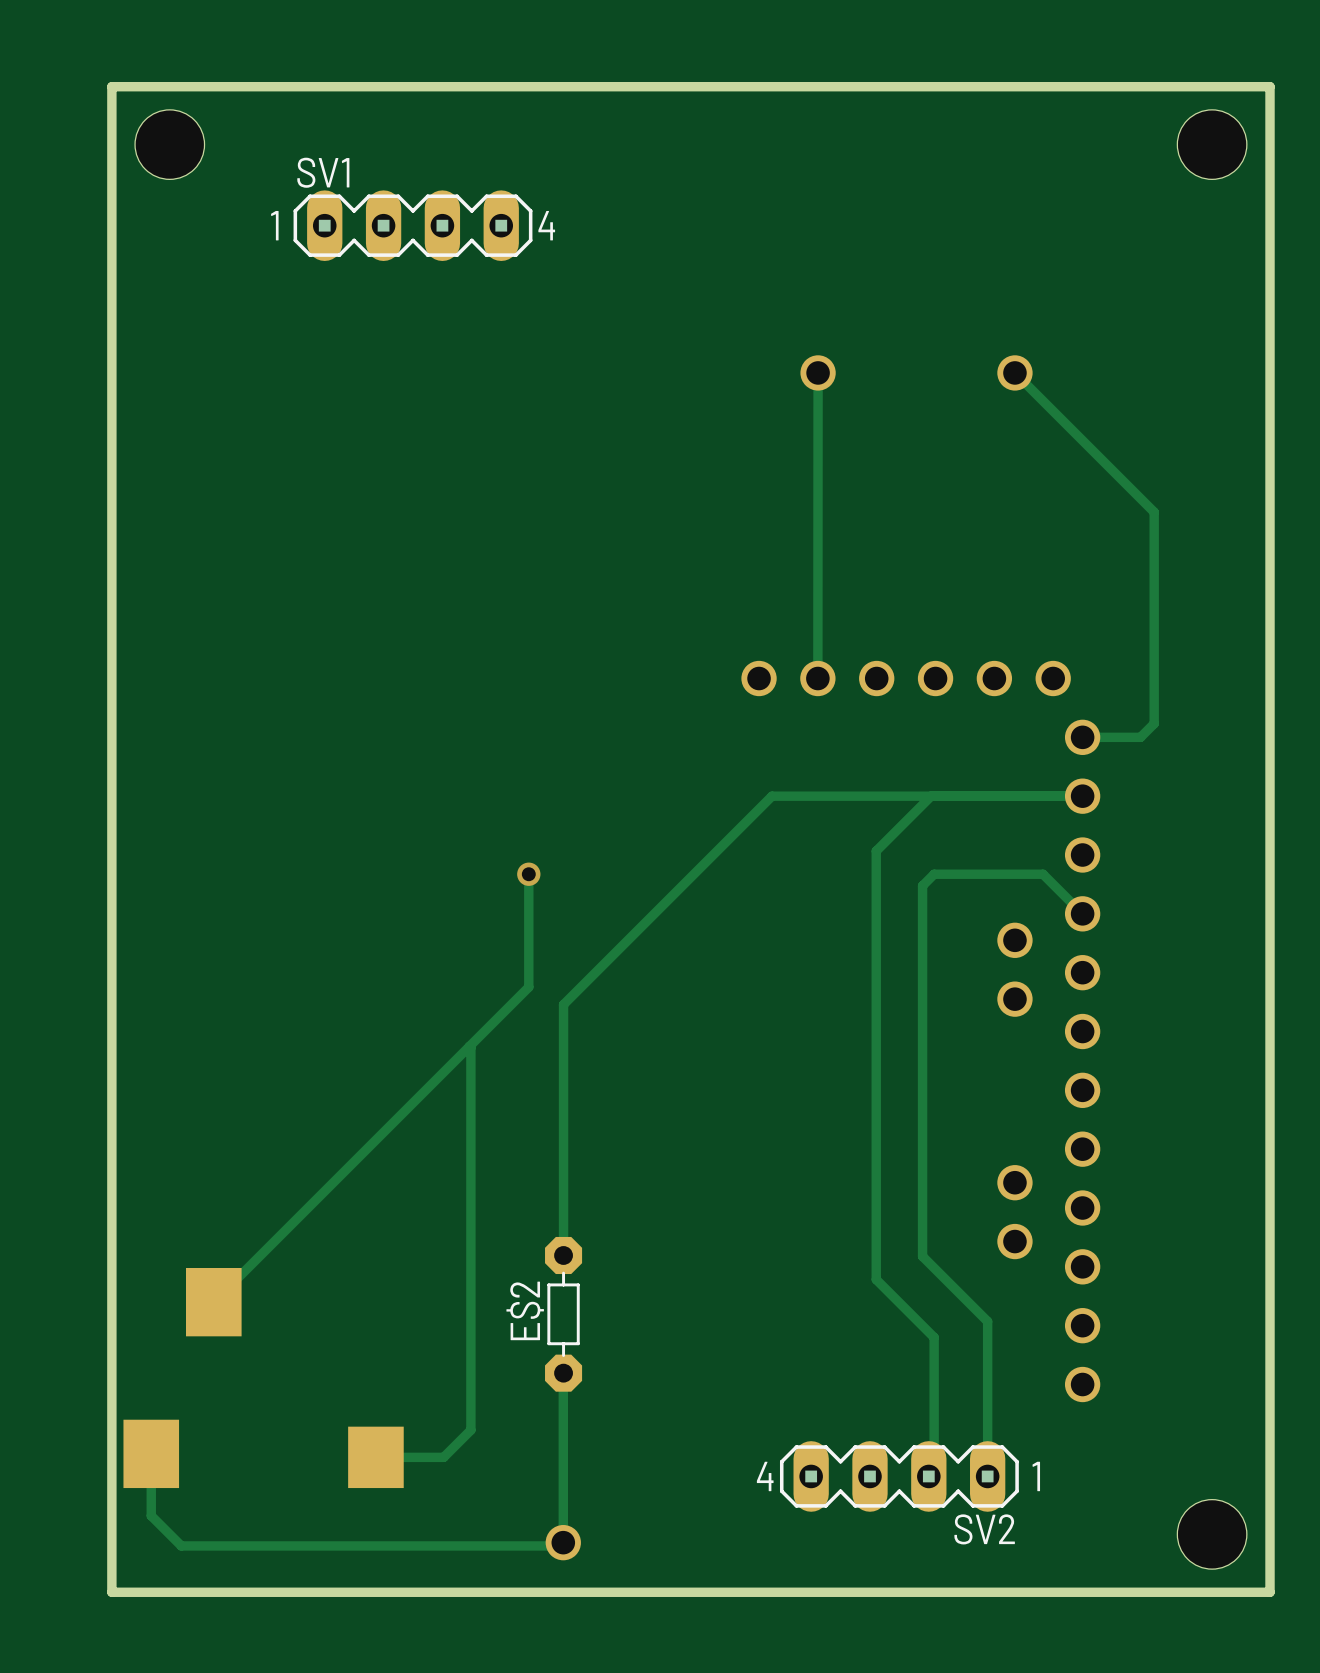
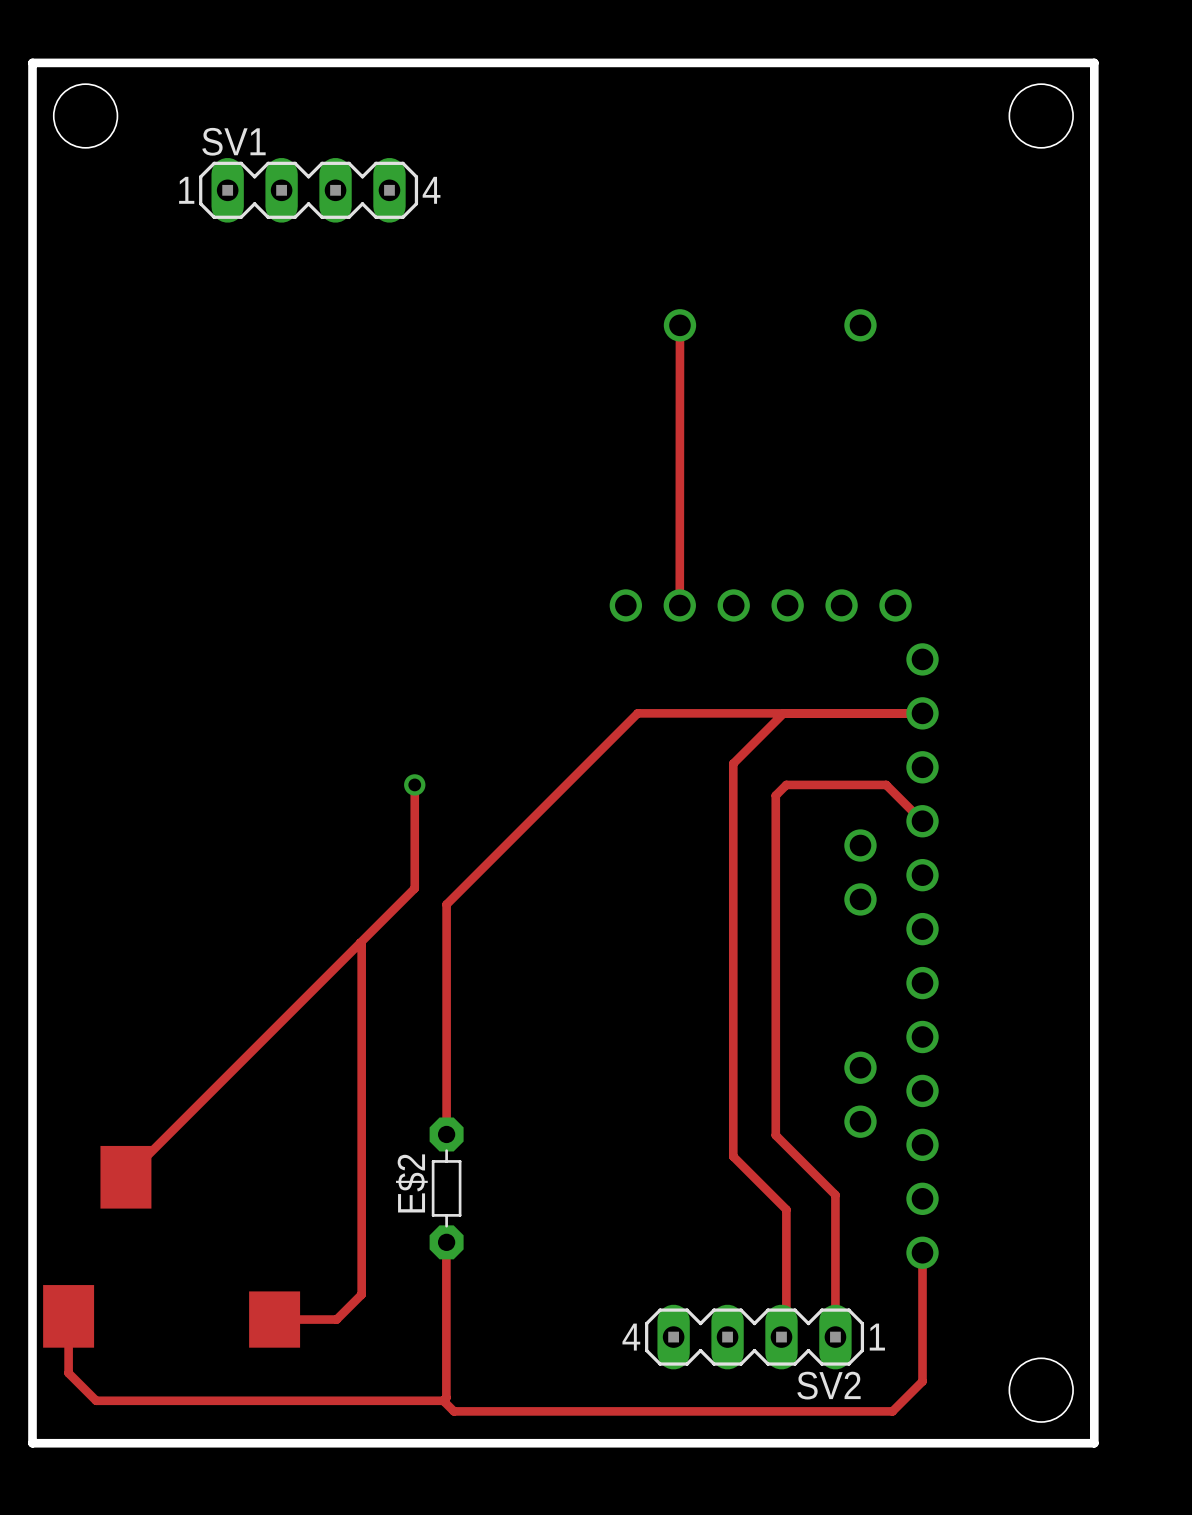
track: (1014, 372) (1154, 512) (1154, 723) (1140, 737) (1082, 737) -> none
track: none -> (922, 1252) (922, 1381) (892, 1411) (453, 1411) (443, 1400)
part: (563, 1542) -> none

